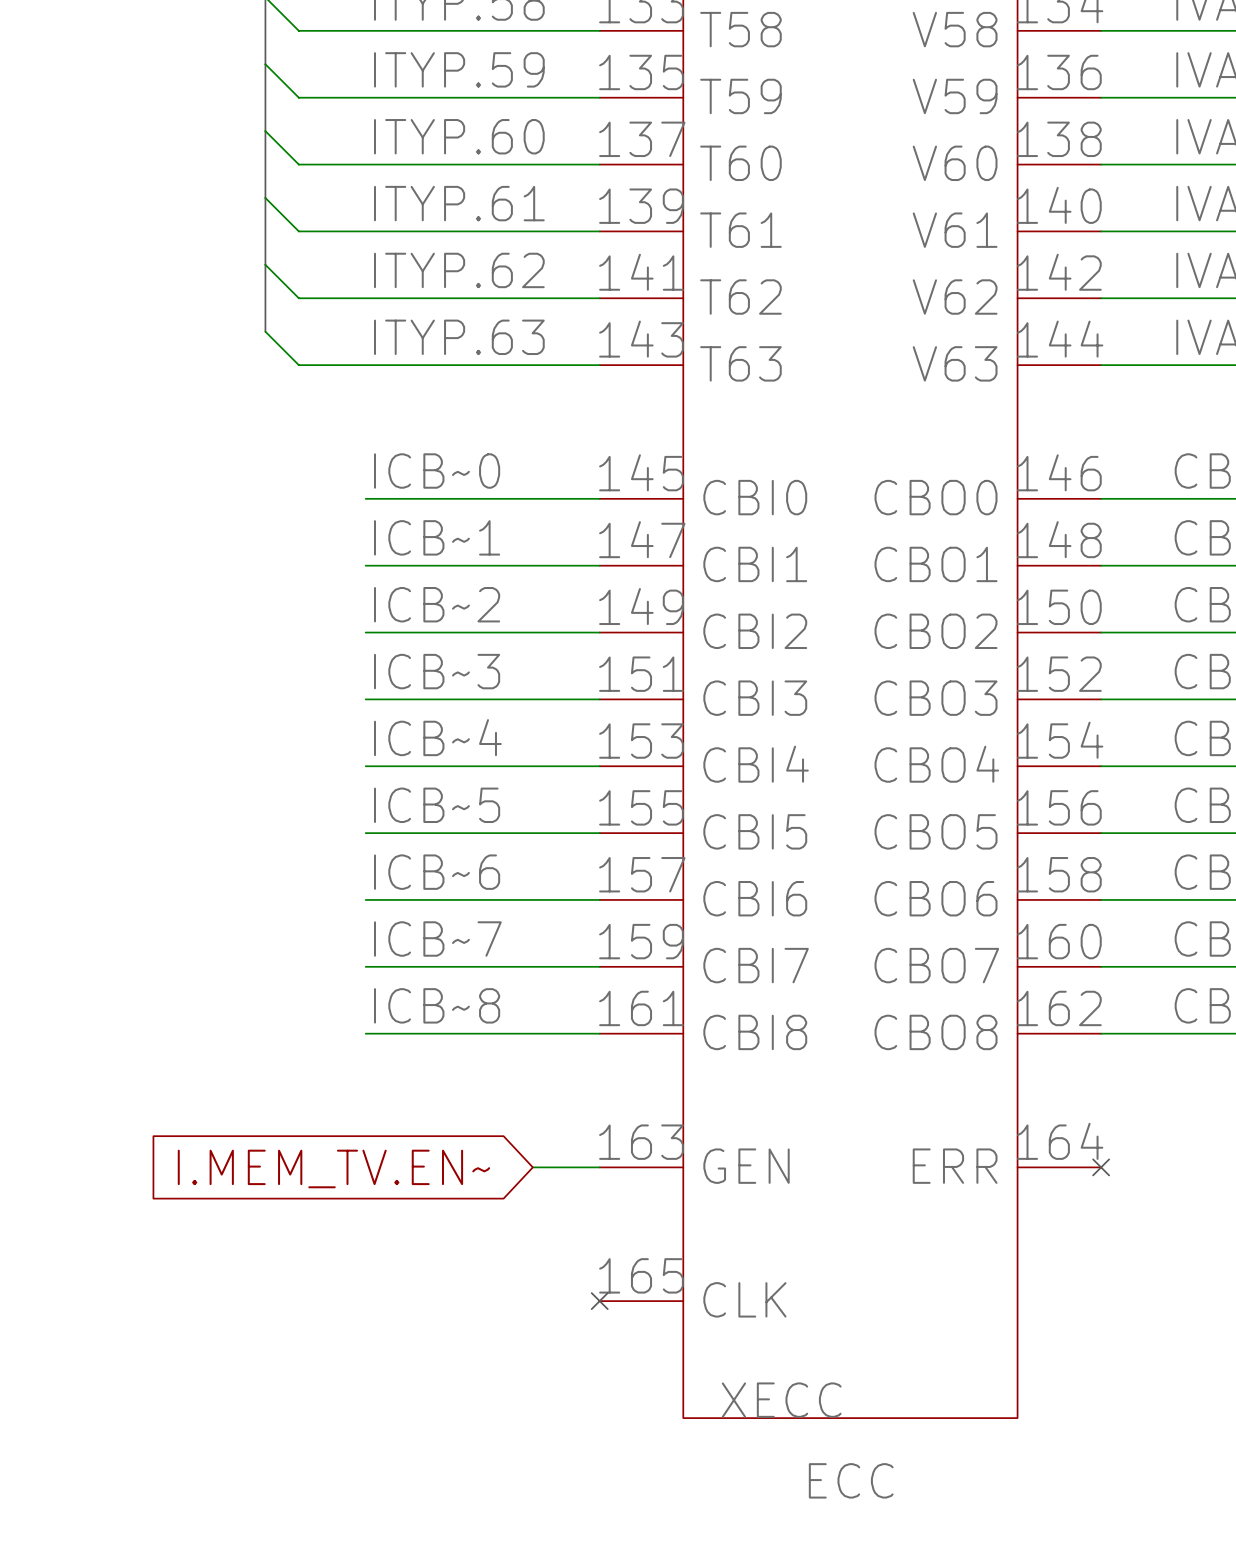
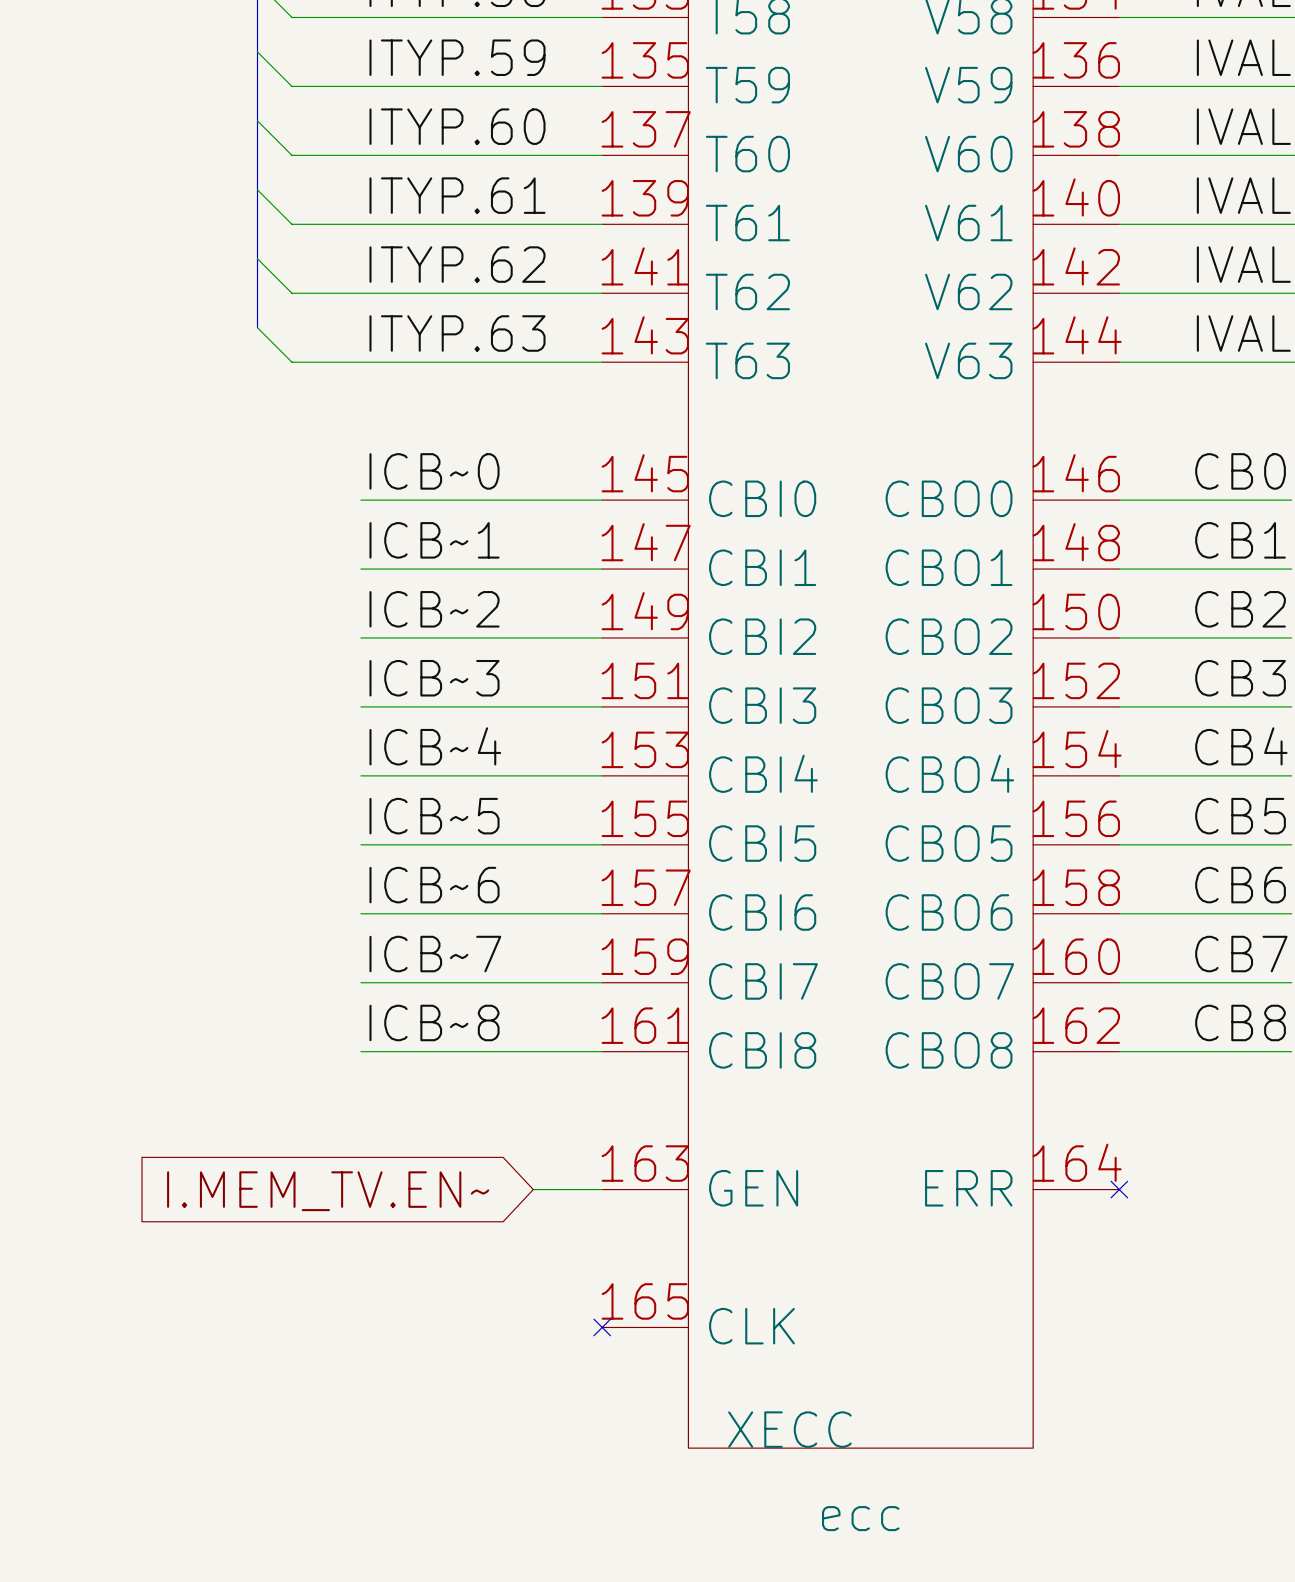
part text: ECC (851, 1480) -> ecc (860, 1518)

